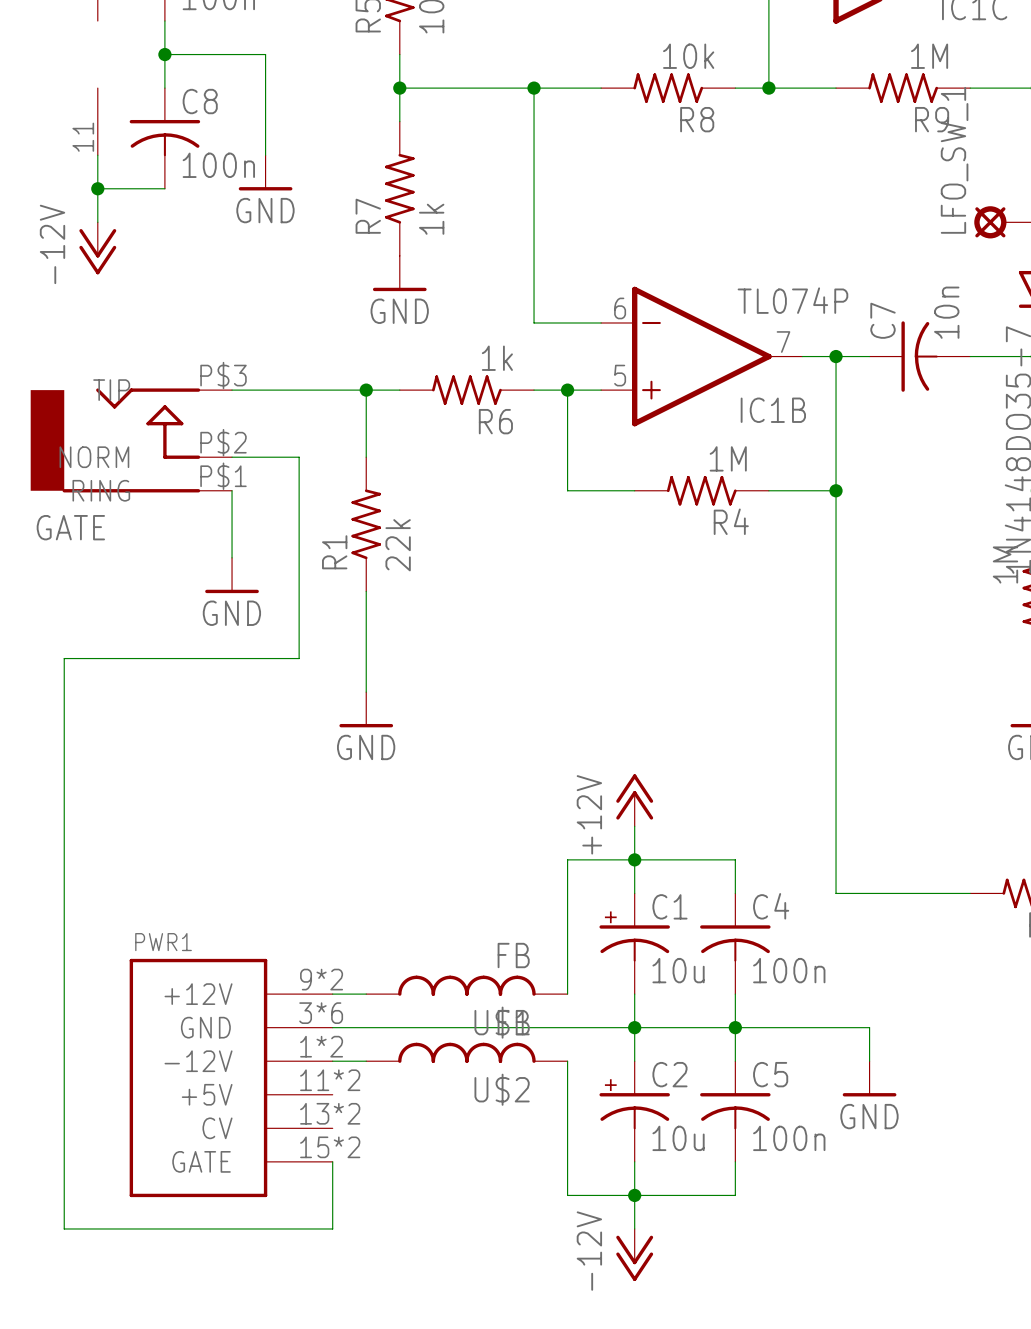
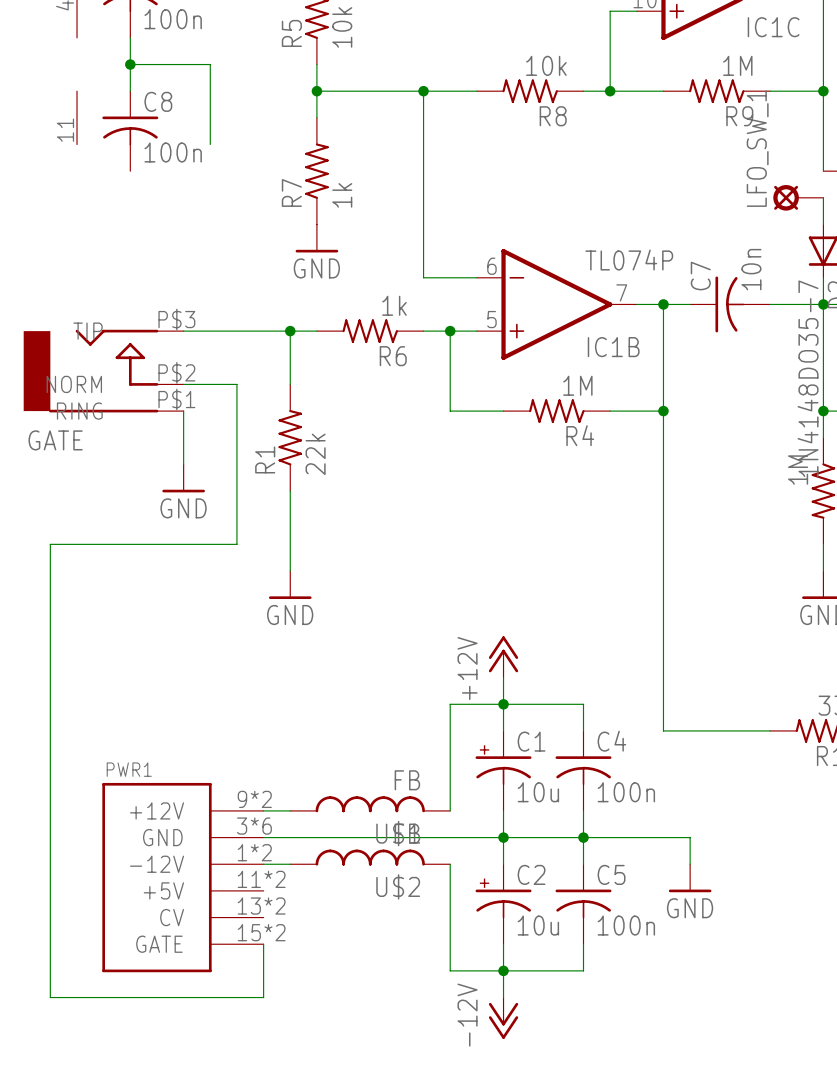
wire: (97, 155) (97, 222) -> none
power symbol: GND (265, 172) -> none
wire: (97, 188) (164, 188) -> none
junction: (97, 188) -> none
power symbol: -12V (97, 248) -> none

